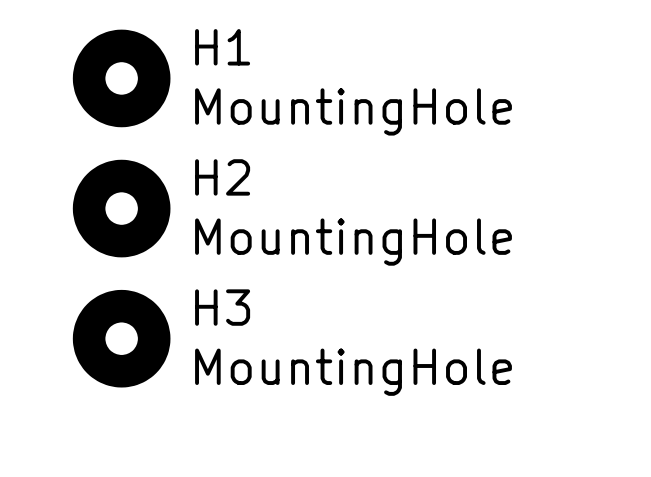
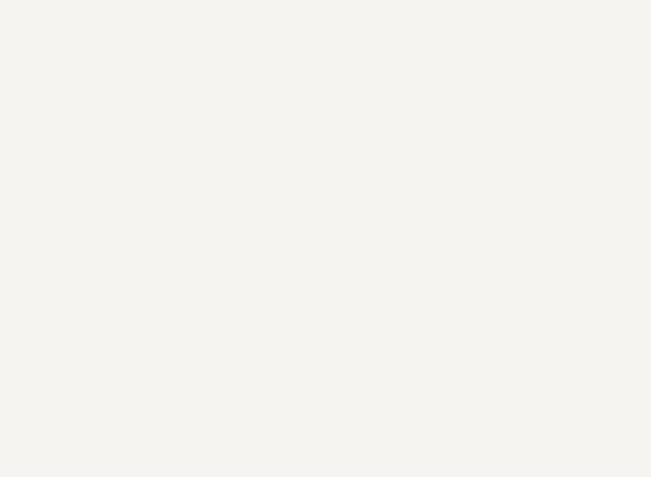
H1: MountingHole (121, 78) -> none
H2: MountingHole (121, 208) -> none
H3: MountingHole (121, 338) -> none

